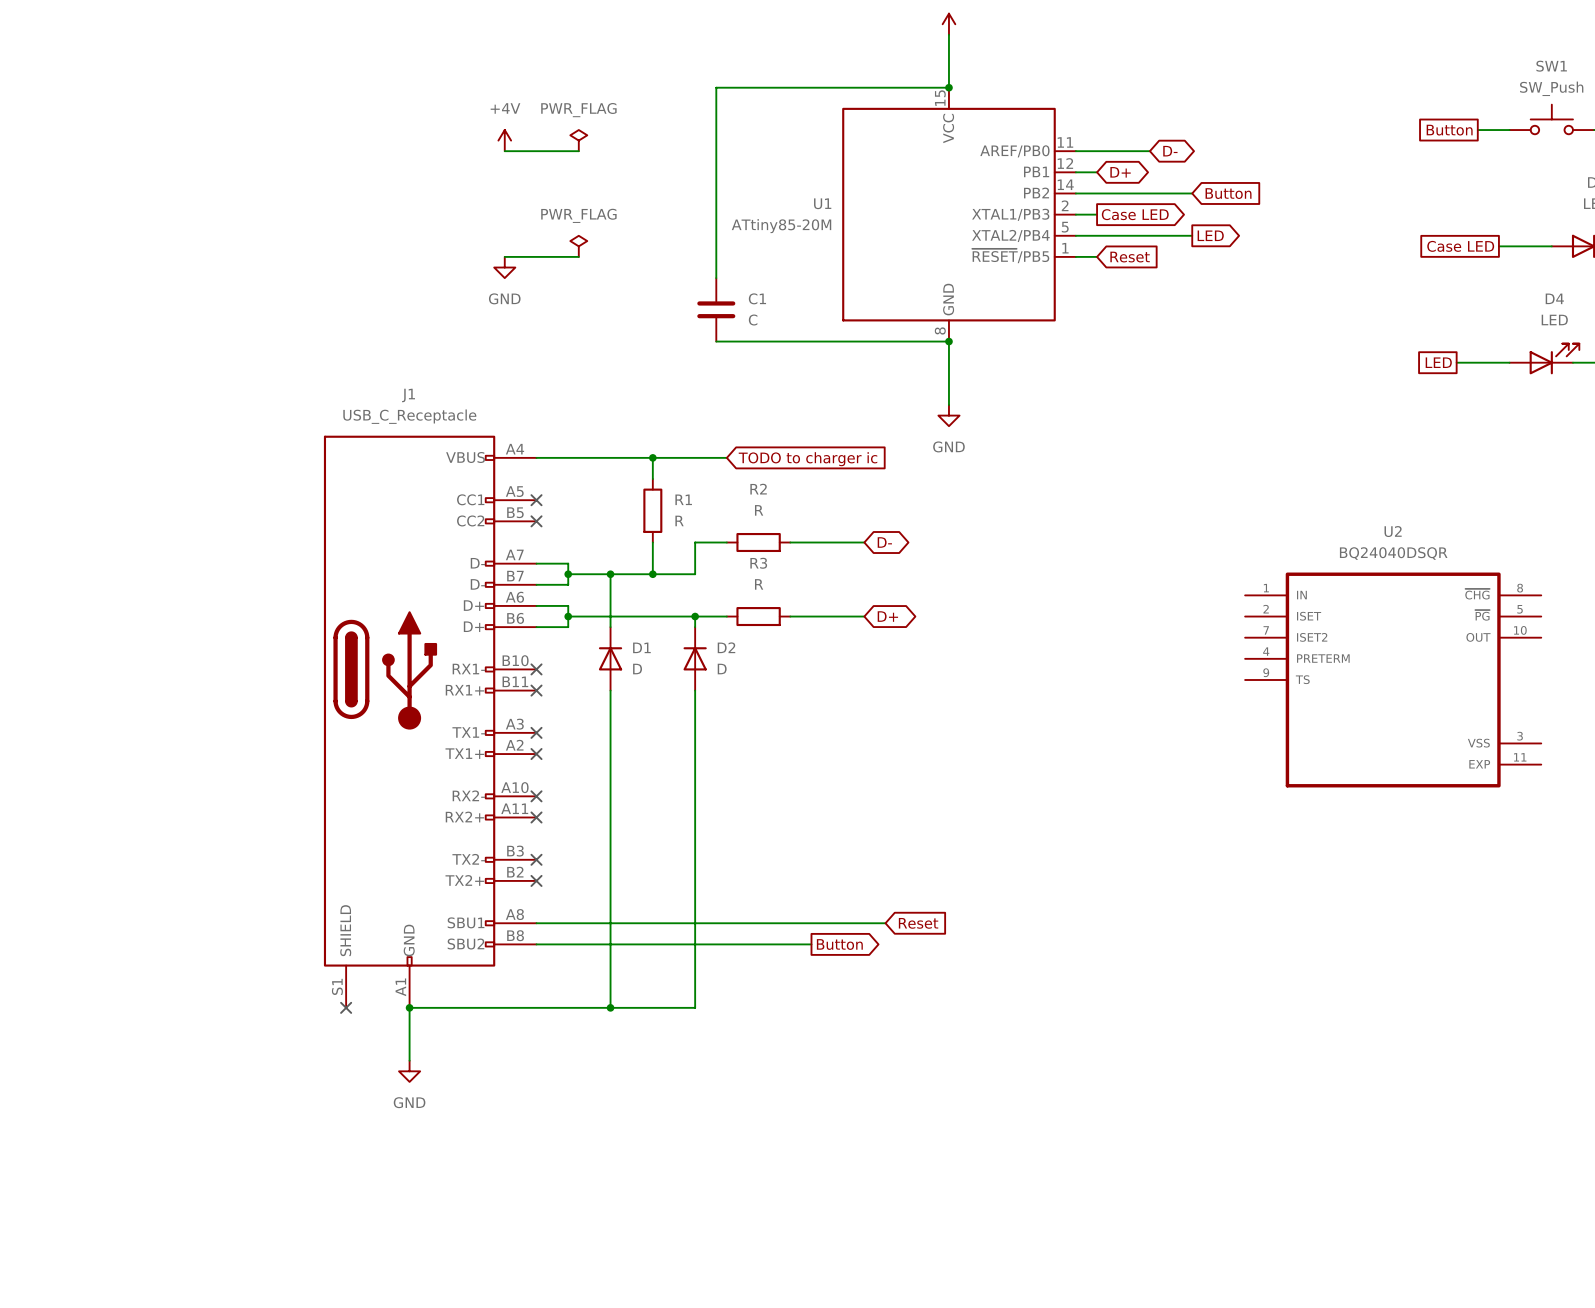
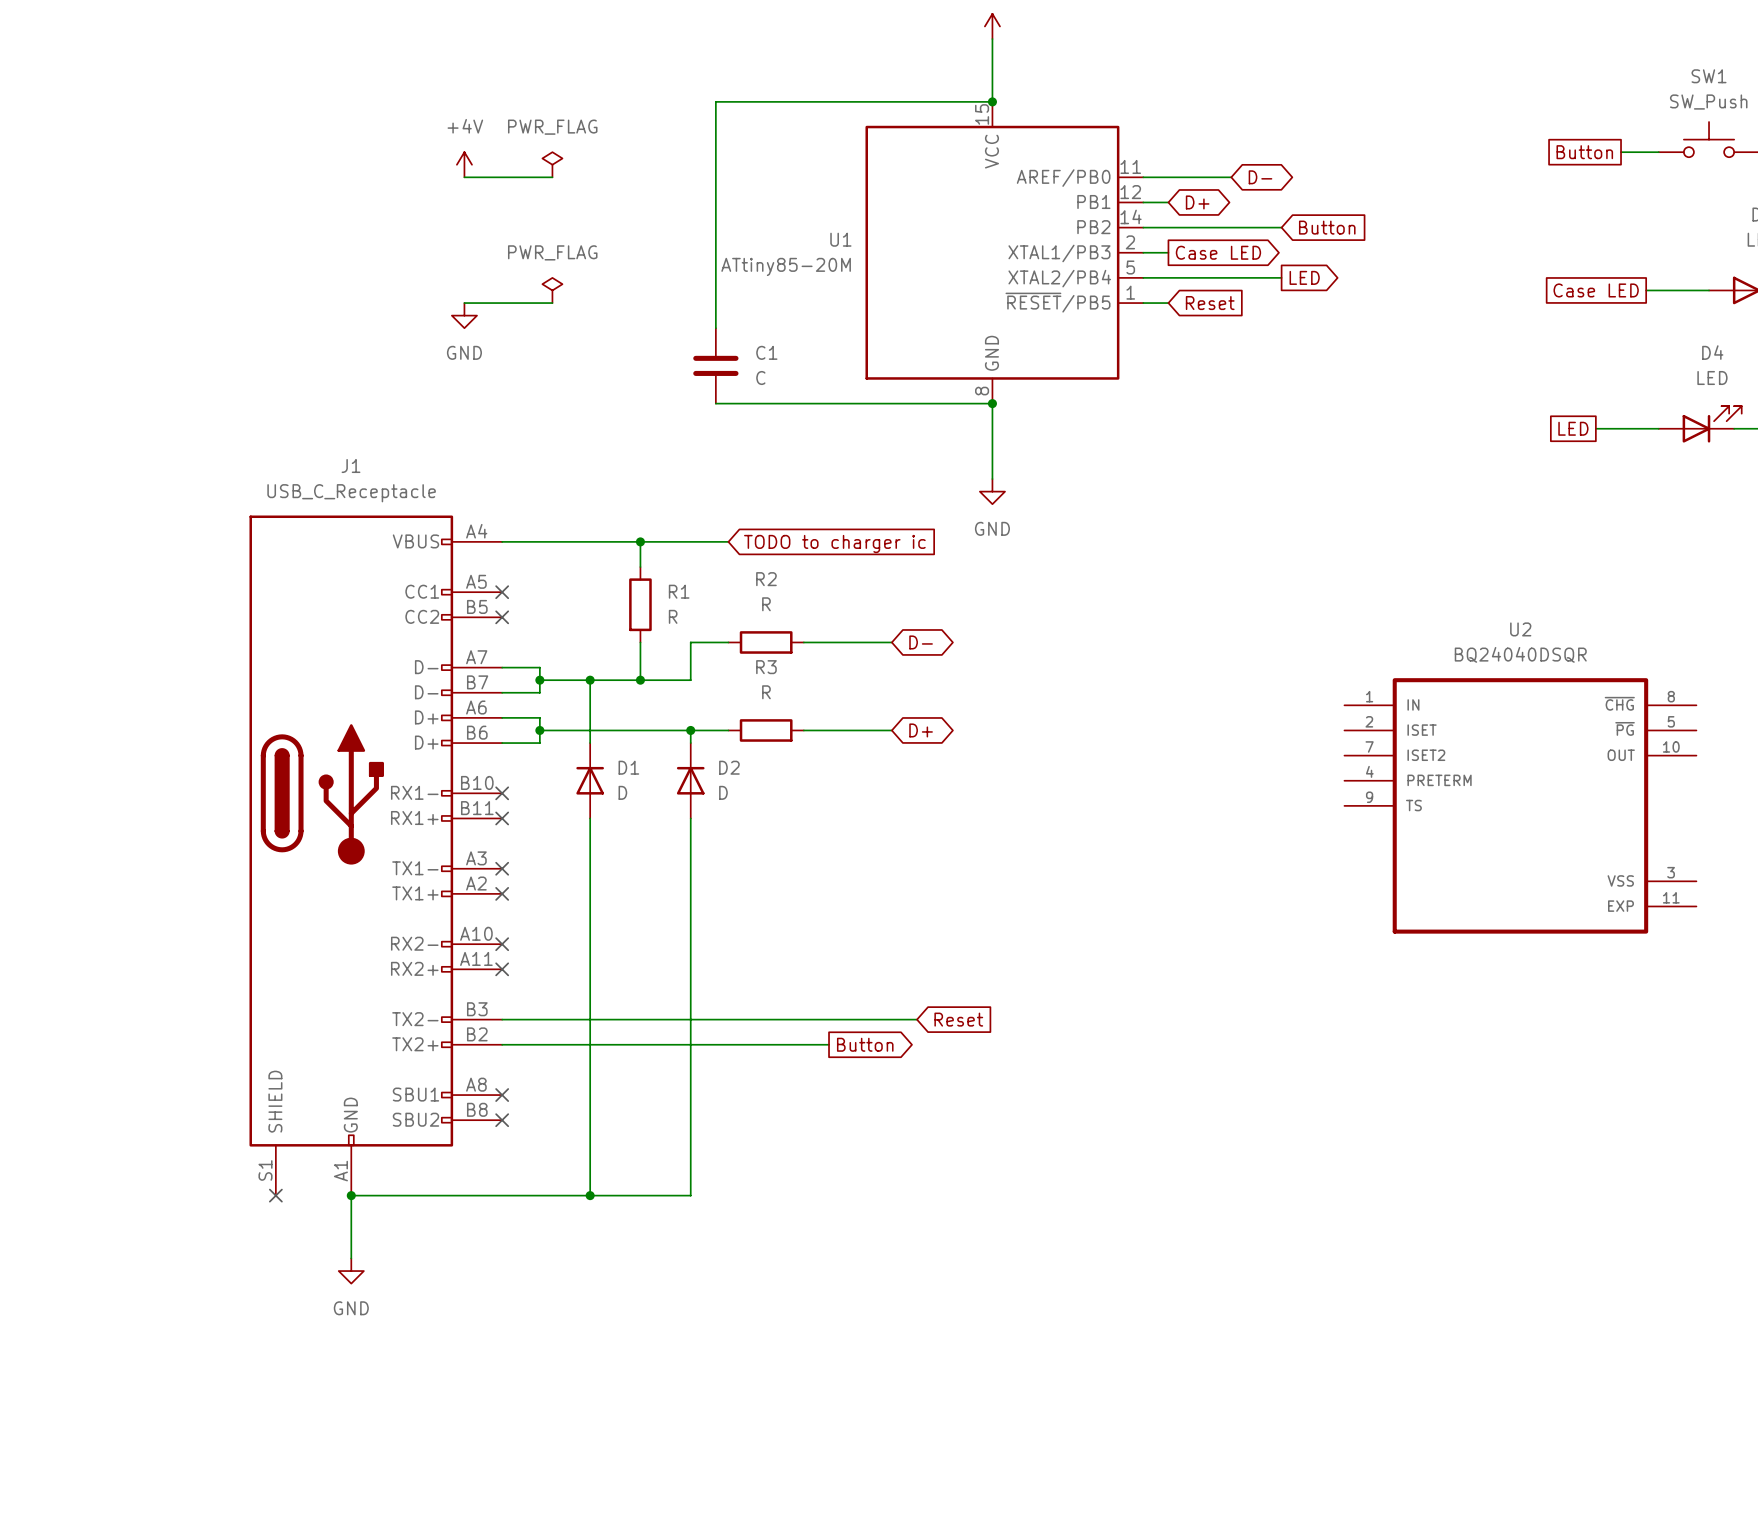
no-connect mark: (536, 859) -> none
no-connect mark: (536, 880) -> none
wire: (536, 923) (885, 923) -> (502, 1019) (917, 1019)
no-connect mark: none -> (502, 1095)
global label position: Reset (918, 923) -> Reset (958, 1019)
wire: (536, 944) (811, 944) -> (502, 1044) (829, 1044)
no-connect mark: none -> (502, 1120)
global label position: Button (839, 944) -> Button (865, 1044)

